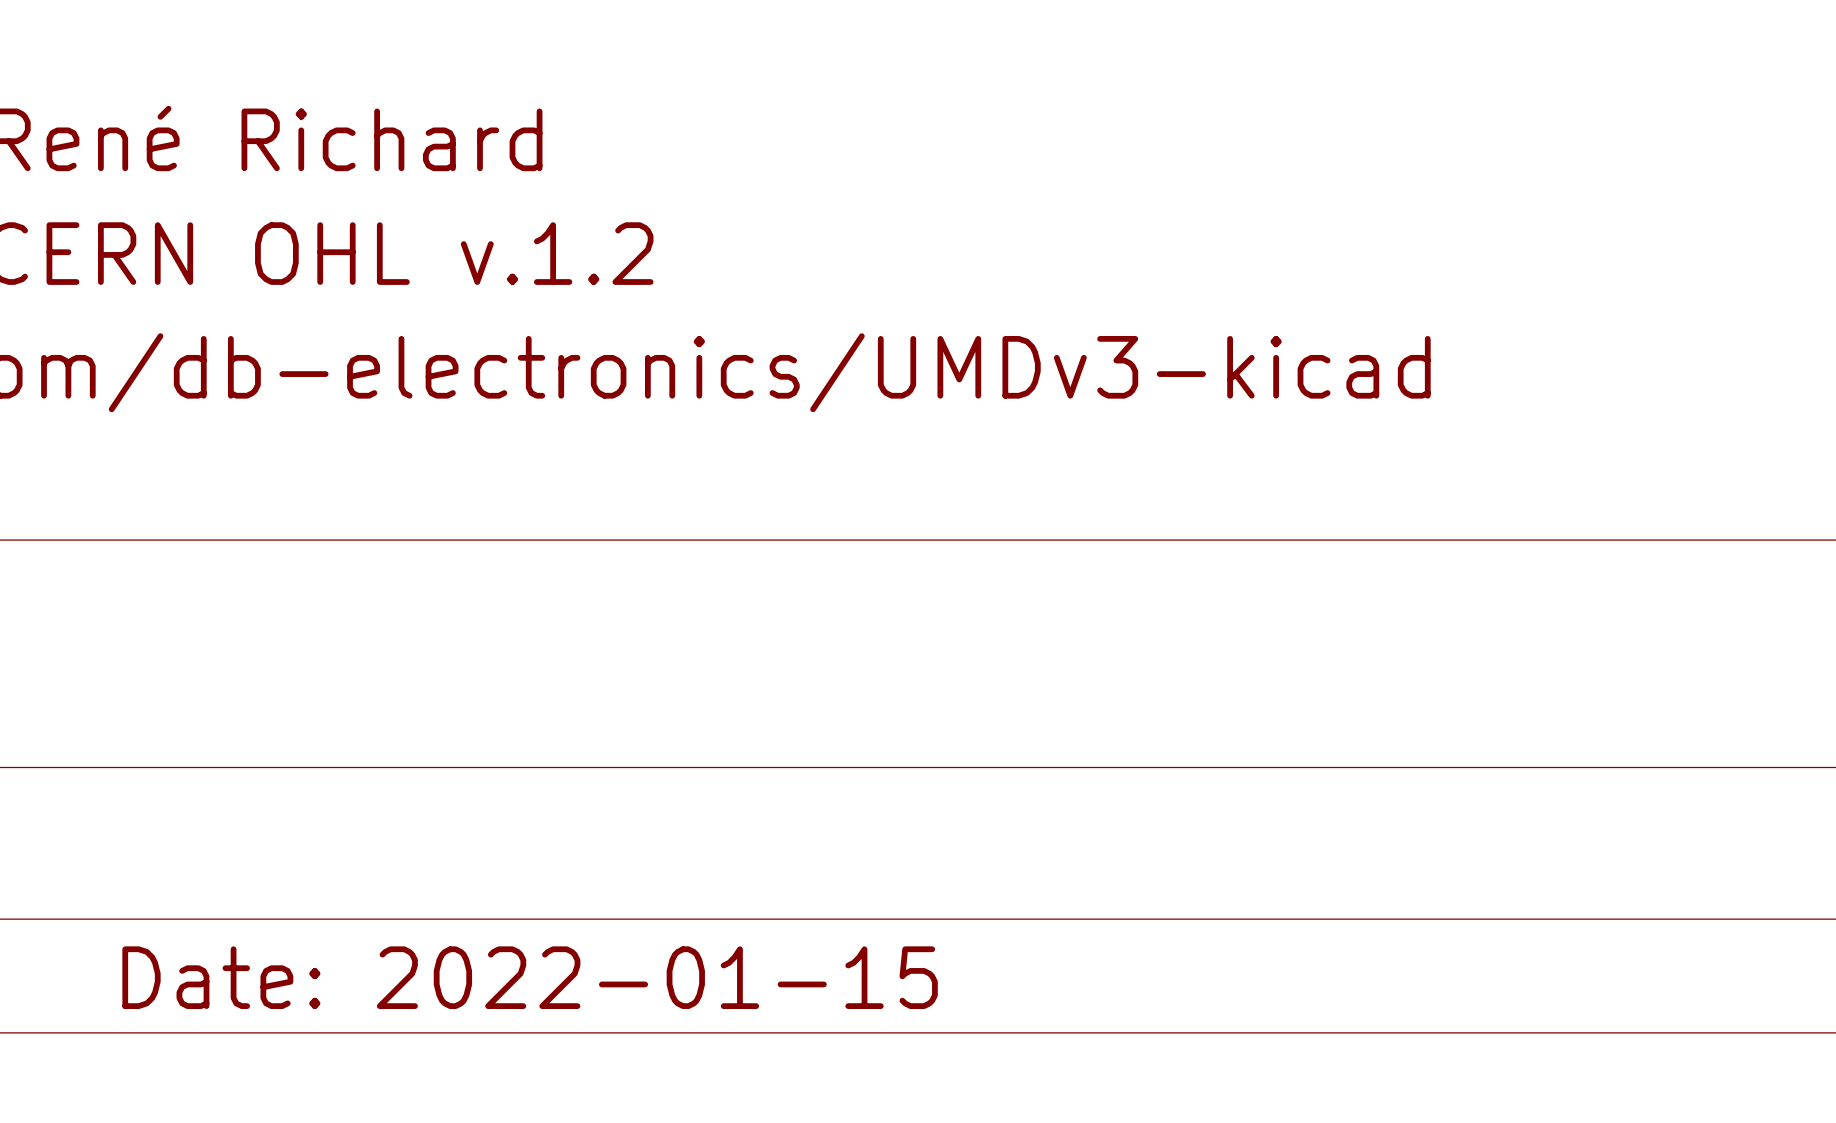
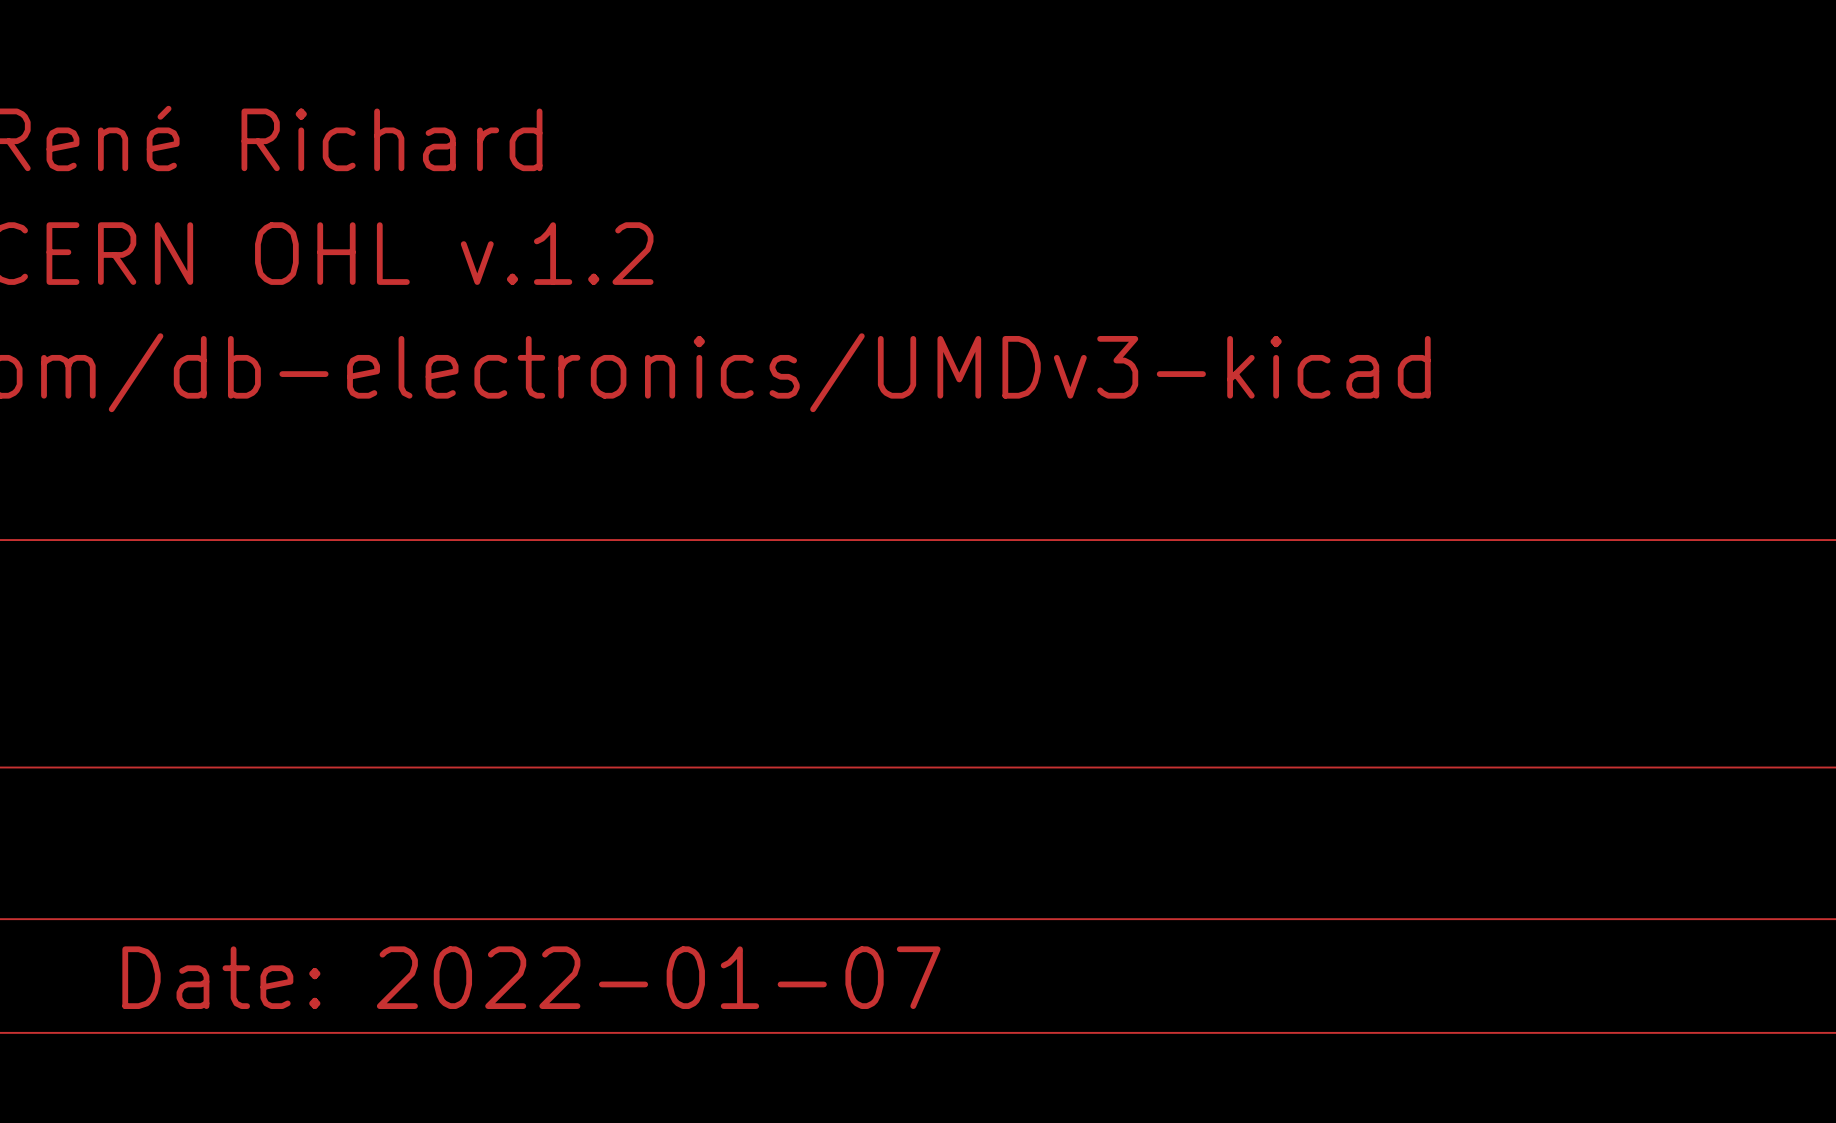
title block: Date: 2022-01-15 (530, 977) -> Date: 2022-01-07 (531, 977)

